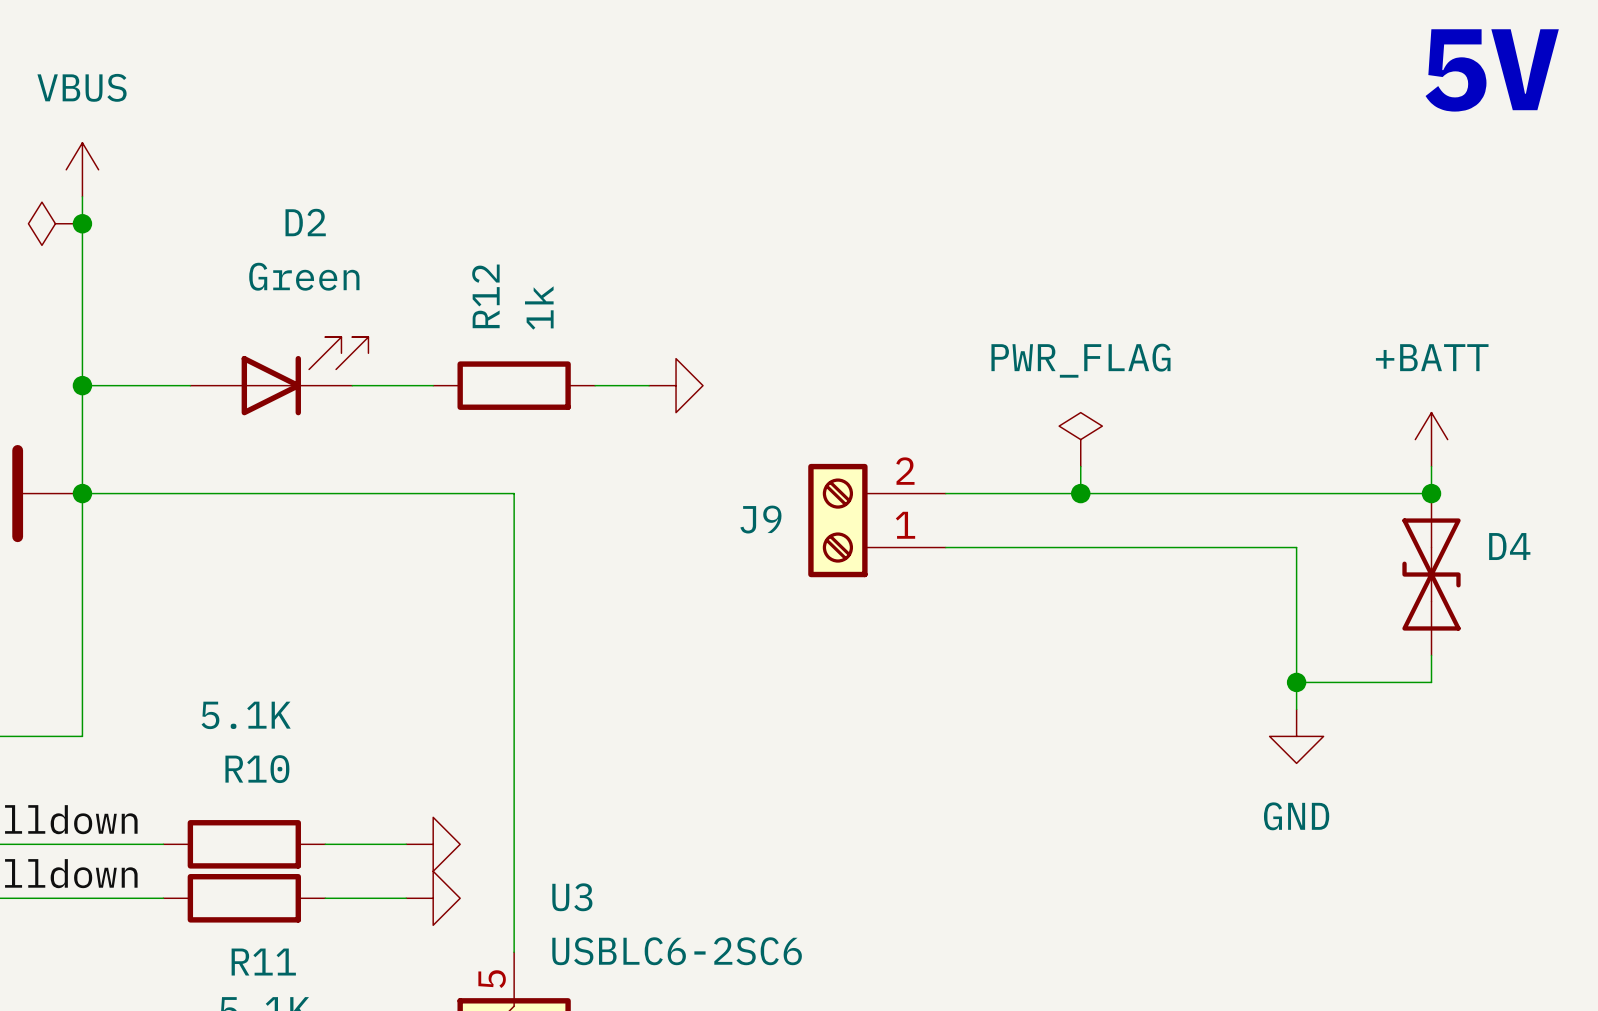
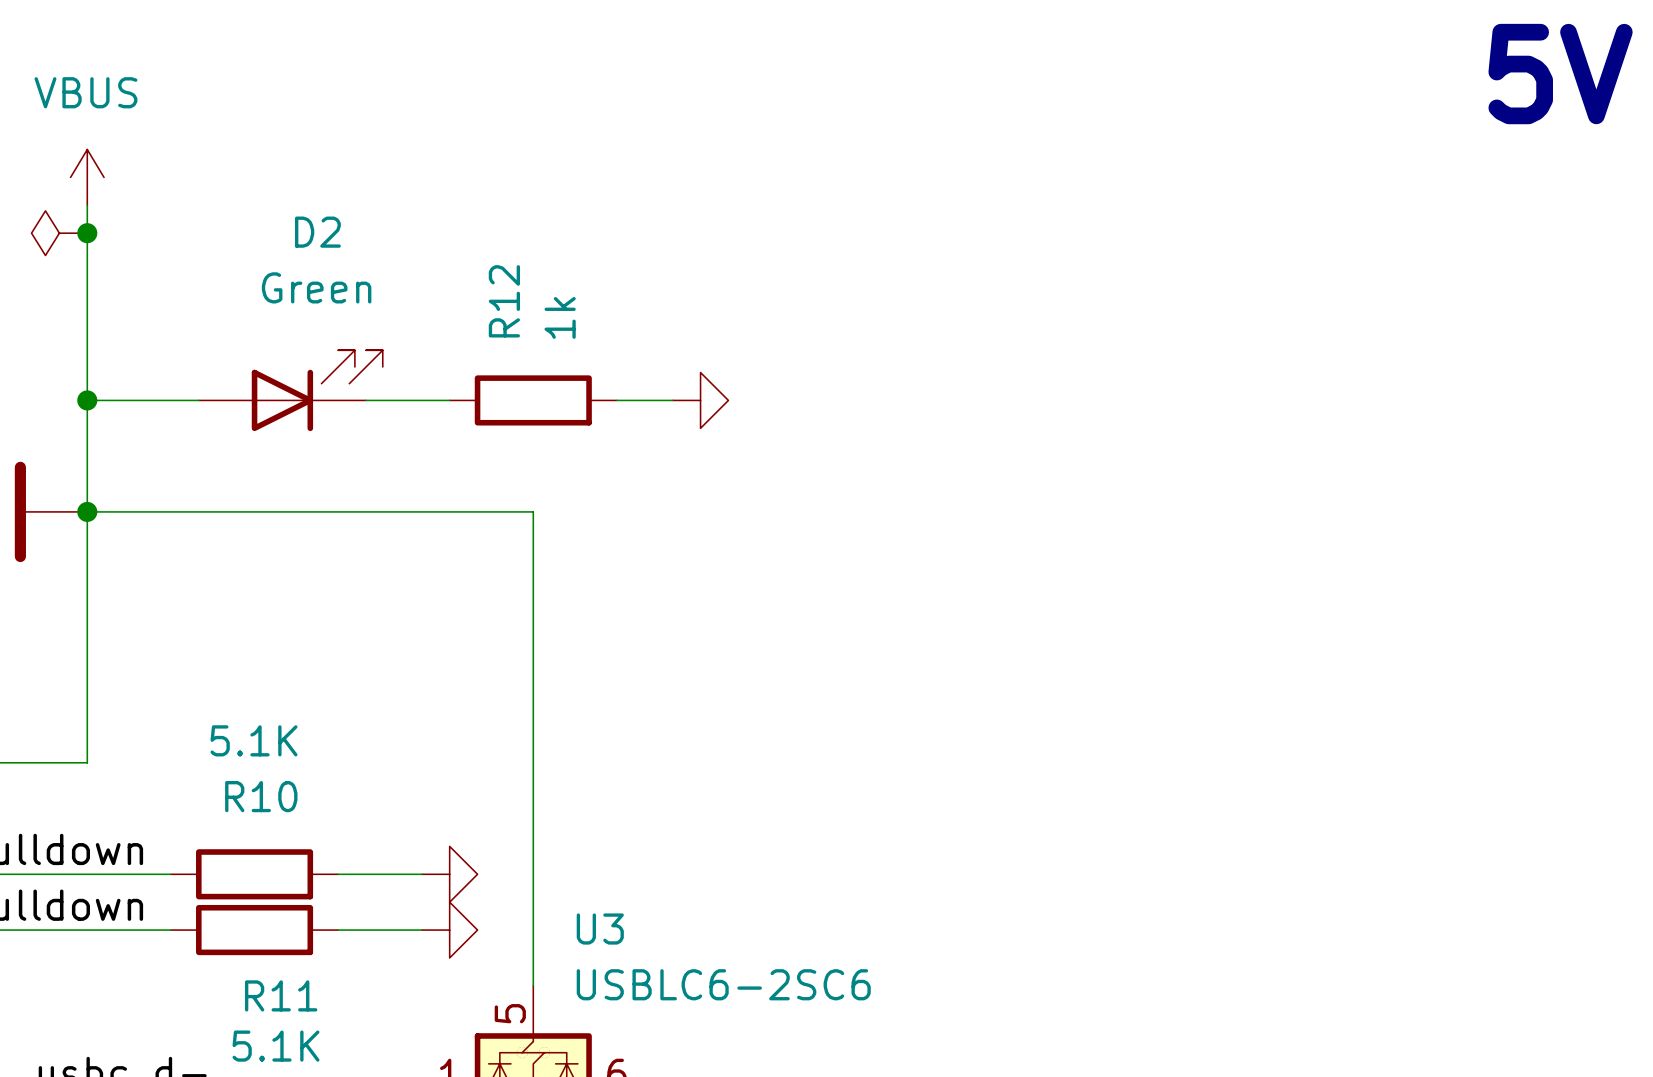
power symbol: PWR_FLAG (1080, 439) -> none
power symbol: +BATT (1431, 439) -> none
wire: (1080, 466) (1080, 493) -> none
wire: (1431, 466) (1431, 493) (945, 493) -> none
junction: (1080, 493) -> none
junction: (1431, 493) -> none
J9: (877, 520) -> none
wire: (945, 547) (1296, 547) (1296, 709) -> none
D4: (1431, 574) -> none
wire: (1431, 655) (1431, 682) (1296, 682) -> none
junction: (1296, 682) -> none
power symbol: GND (1296, 736) -> none

